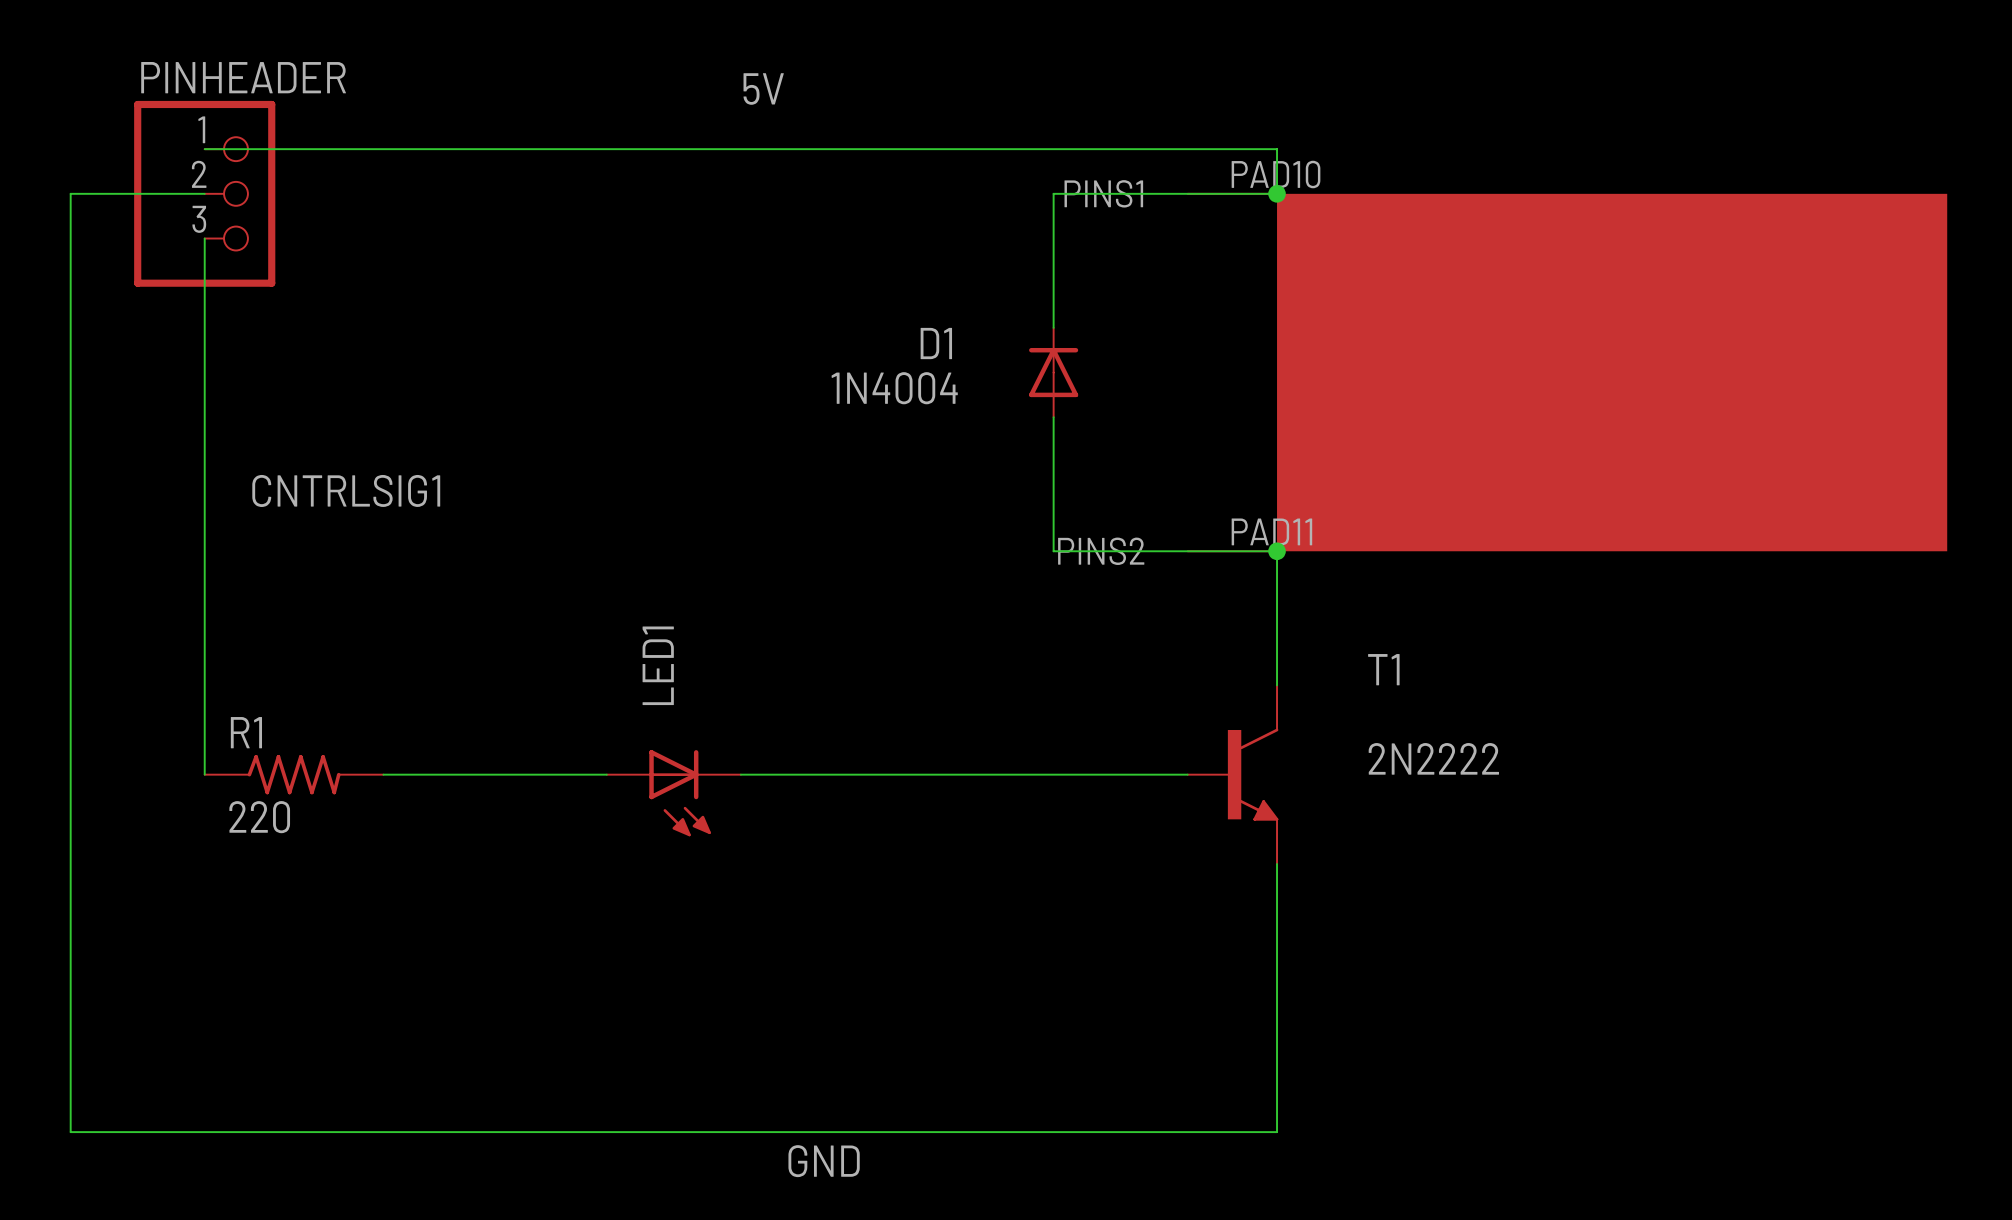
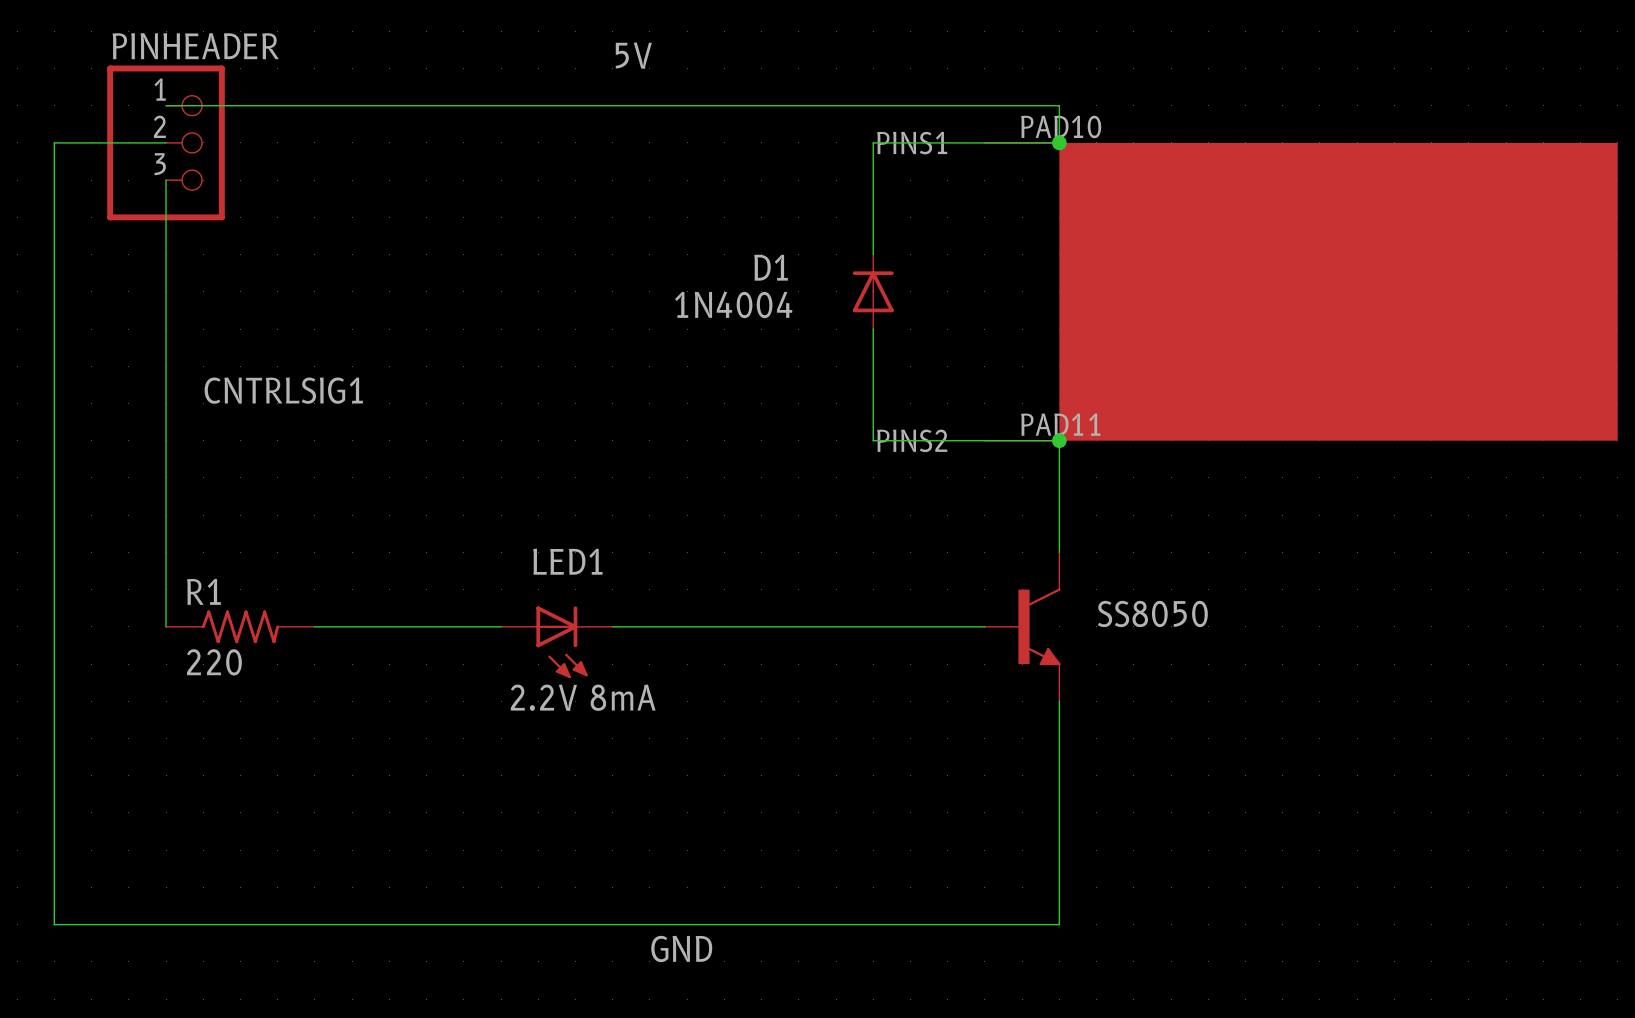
LED1 name rotation: 0° (658, 665) -> 90° clockwise (567, 561)
T1 name: T1 (1383, 669) -> SS8050 (1152, 613)
T1 value: 2N2222 (1433, 758) -> none
LED1 value: none -> 2.2V 8mA (583, 697)

